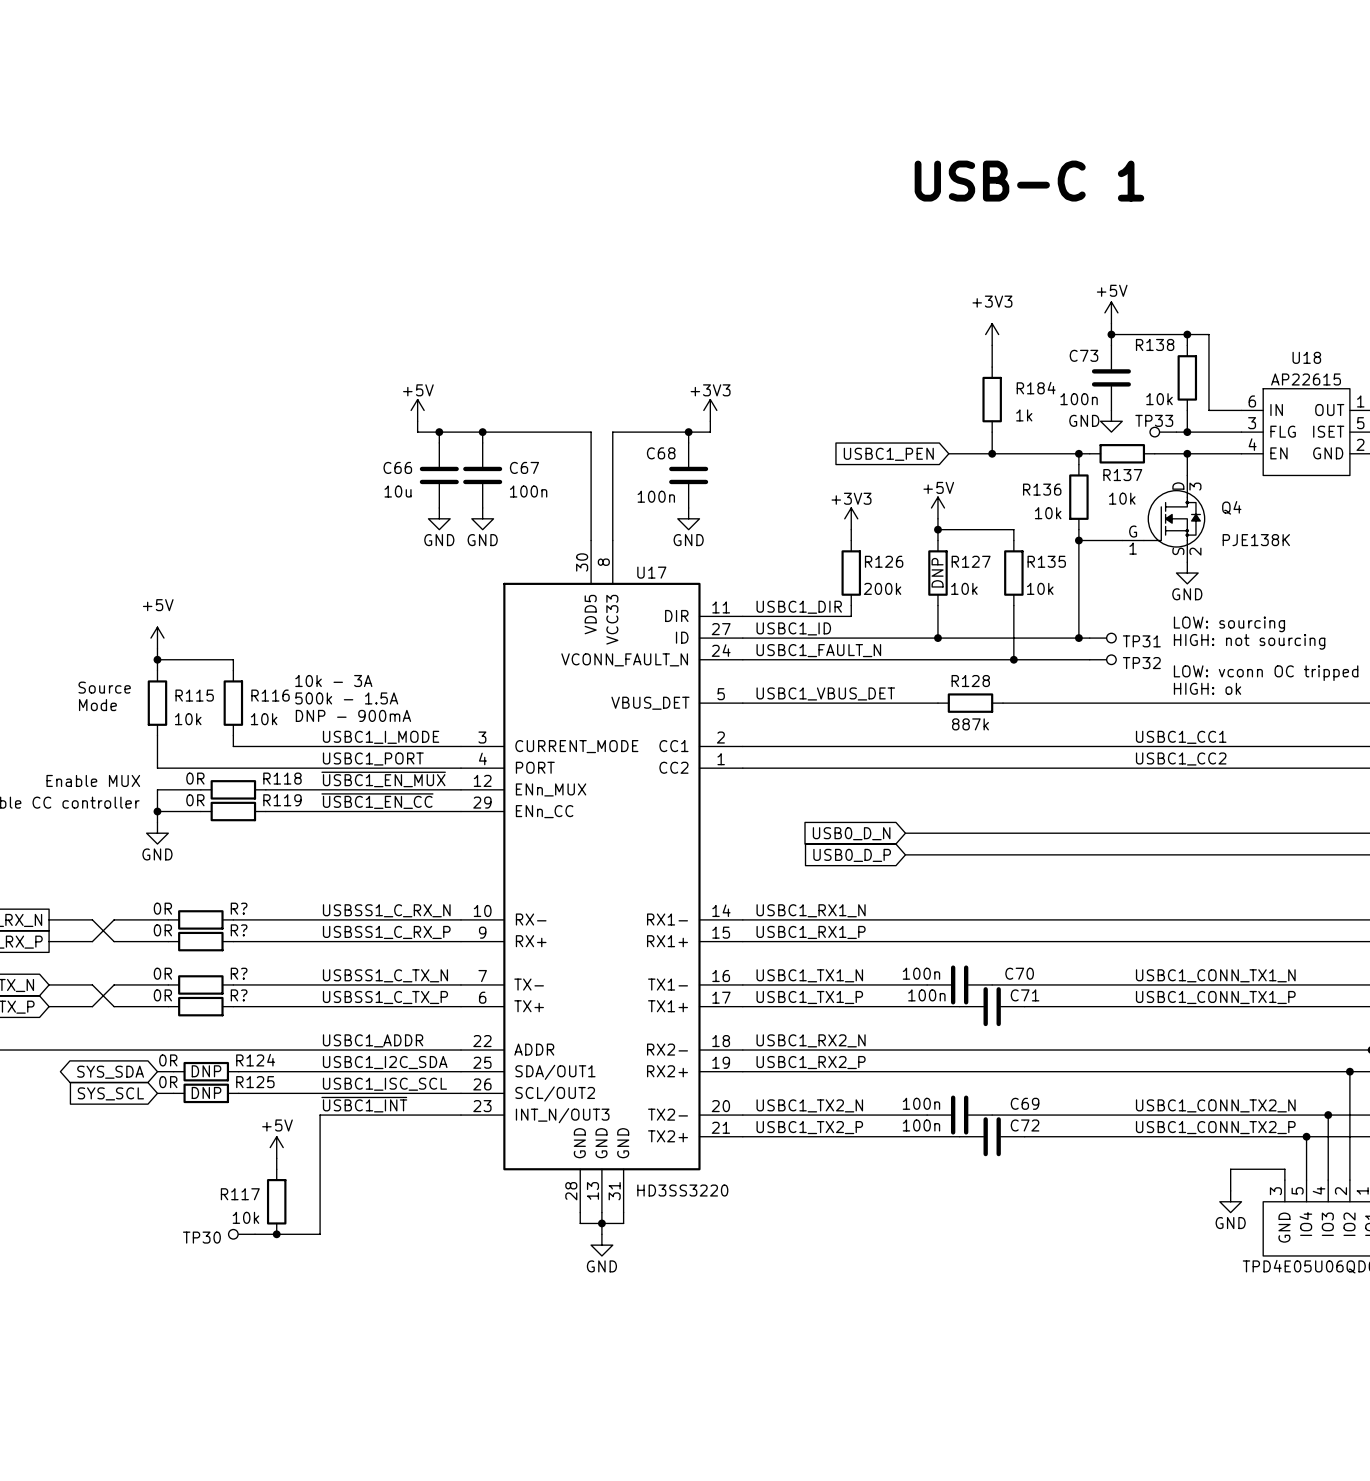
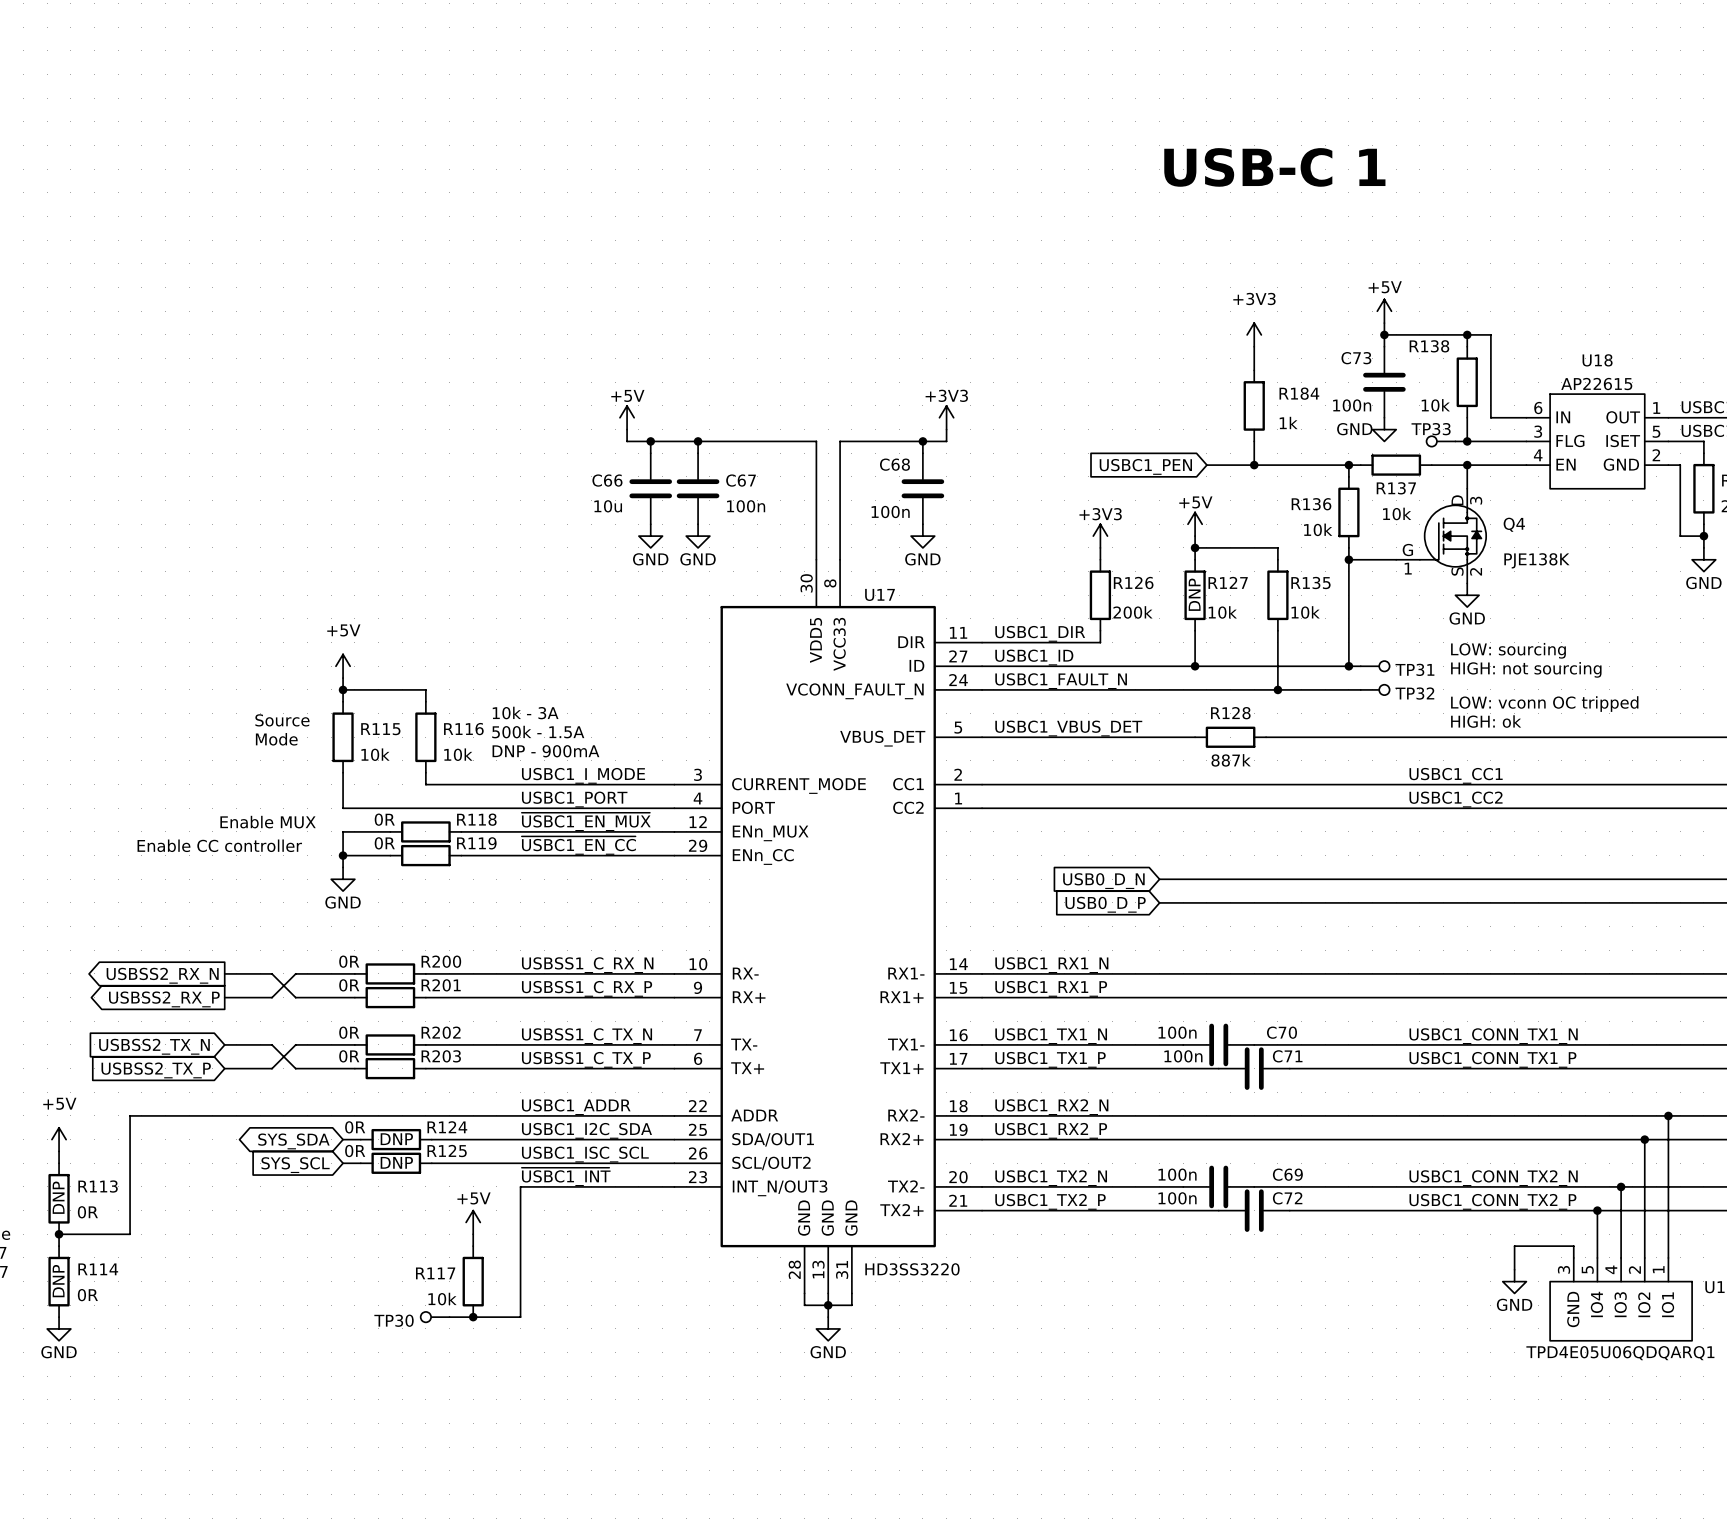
R? name: R? (239, 908) -> R200 (441, 961)
R? name: R? (239, 930) -> R201 (441, 985)
R? name: R? (239, 973) -> R202 (441, 1032)
R? name: R? (239, 995) -> R203 (441, 1056)

